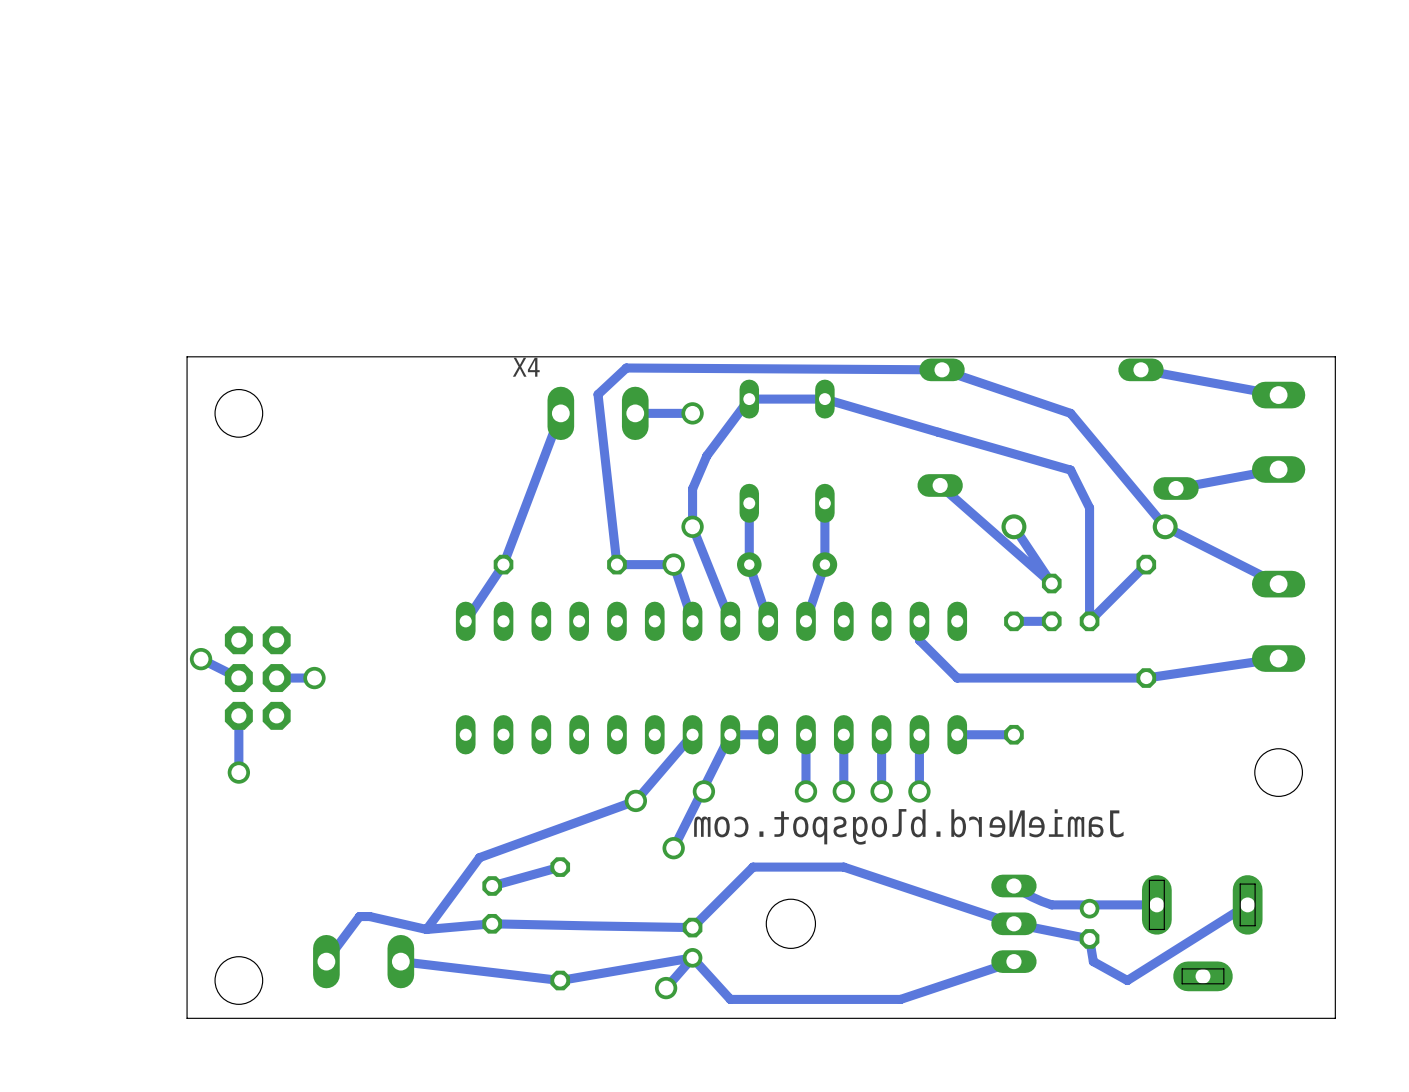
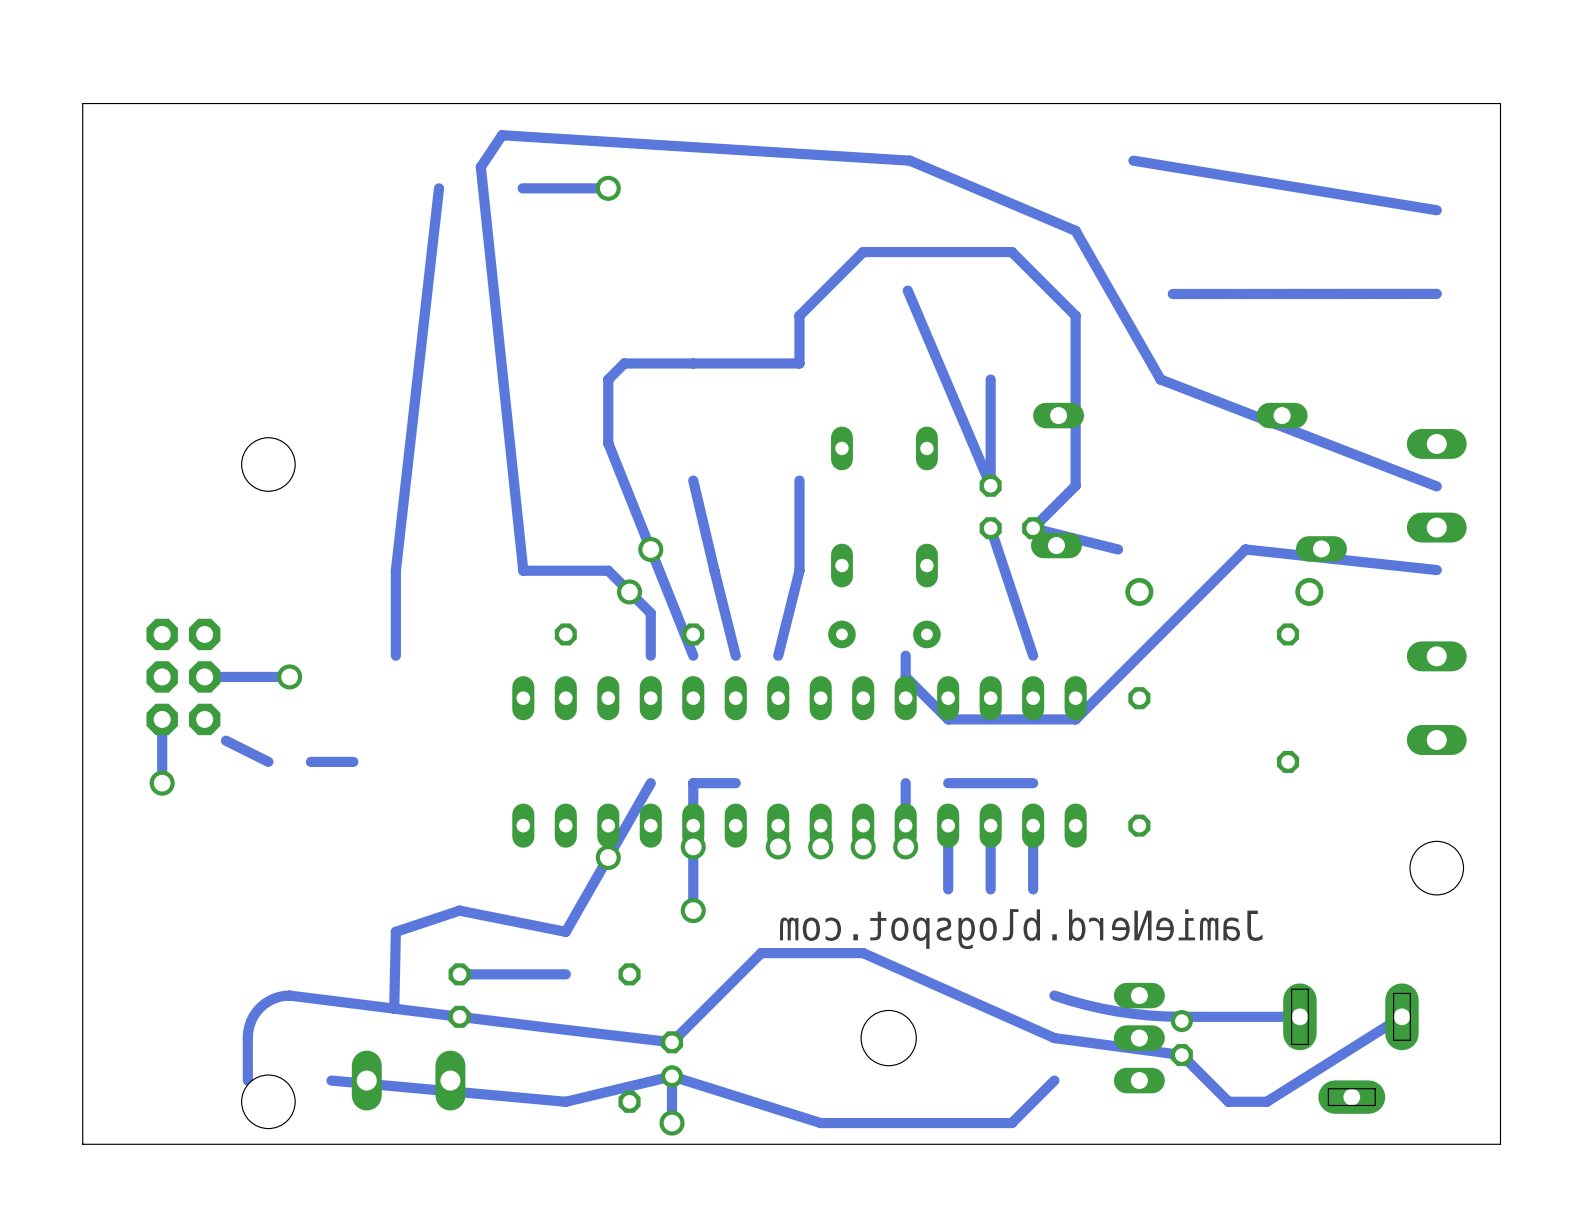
bottom track: none -> (1133, 160) (1436, 210)
bottom track: none -> (439, 188) (395, 570) (395, 655)
bottom track: none -> (608, 188) (522, 188)
via: none -> (608, 188)
bottom track: none -> (907, 290) (990, 485) (990, 379)
bottom track: none -> (1436, 293) (1172, 294)
board edge: (1335, 356) (187, 356) (187, 1018) -> (1500, 400) (1500, 103) (82, 103) (82, 1144) (210, 1144)
bottom track: (1140, 369) (1278, 395) -> none
bottom track: (560, 413) (503, 564) (465, 621) -> none
X4: (598, 413) -> none
bottom track: (692, 413) (635, 413) -> none
via: (692, 413) -> none
bottom track: none -> (693, 480) (735, 655)
bottom track: none -> (799, 480) (799, 570) (778, 655)
bottom track: none -> (1436, 486) (1160, 379) (1075, 230) (909, 160) (502, 135) (480, 167) (523, 570) (608, 570) (650, 613) (650, 655)
bottom track: (1278, 469) (1176, 488) -> none
bottom track: none -> (990, 528) (1033, 655)
bottom track: (940, 485) (1051, 583) (1013, 526) -> none
via: none -> (650, 549)
bottom track: none -> (1118, 549) (1033, 528) (1075, 485) (1075, 315) (1011, 252) (863, 252) (799, 315) (799, 363) (624, 363) (608, 379) (608, 443) (693, 655)
bottom track: (749, 503) (749, 564) (768, 621) -> none
bottom track: (824, 503) (824, 564) (805, 621) -> none
bottom track: none -> (1436, 570) (1245, 549) (1075, 719) (948, 719) (905, 676) (905, 655)
via: none -> (629, 591)
via: (692, 526) -> none
via: (673, 564) -> none
bottom track: (1146, 564) (1089, 621) (1089, 507) (1070, 470) (824, 399) (749, 399) (706, 455) (692, 489) (692, 526) (730, 621) -> none
bottom track: (1278, 584) (1165, 526) (1070, 413) (942, 369) (626, 368) (598, 394) (616, 564) (673, 564) (692, 621) -> none
bottom track: none -> (289, 676) (204, 676)
via: none -> (289, 676)
part position: (1070, 602) -> (1011, 506)
bottom track: (919, 621) (919, 640) (957, 678) (1146, 678) (1278, 658) -> none
bottom track: (1051, 621) (1013, 621) -> none
via: (201, 659) -> none
part position: (257, 678) -> (183, 676)
via: (314, 678) -> none
via: none -> (162, 783)
bottom track: none -> (650, 783) (565, 931) (459, 910) (395, 931) (394, 1008)
bottom track: none -> (735, 783) (693, 783) (693, 910)
bottom track: none -> (1033, 783) (948, 783)
bottom track: (238, 715) (238, 772) -> (162, 719) (162, 783)
bottom track: (692, 734) (635, 800) (479, 857) (426, 929) -> none
bottom track: (768, 734) (730, 734) (673, 848) -> none
bottom track: (1013, 734) (957, 734) -> none
via: none -> (693, 846)
via: none -> (778, 846)
via: none -> (820, 846)
via: none -> (863, 846)
bottom track: (805, 753) (805, 791) -> (905, 783) (905, 825)
via: none -> (905, 846)
via: none -> (608, 857)
via: (238, 772) -> none
via: (703, 791) -> none
via: (805, 791) -> none
via: (843, 791) -> none
via: (881, 791) -> none
via: (919, 791) -> none
via position: (635, 800) -> (693, 910)
via: (673, 848) -> none
bottom track: none -> (565, 974) (459, 974)
bottom track: (560, 867) (492, 886) -> none
bottom track: (1013, 886) (1032, 897) (1051, 904) -> (1054, 995) (1117, 1011) (1181, 1016)
part position: (492, 904) -> (459, 995)
part position: (1089, 923) -> (1181, 1038)
bottom track: (426, 929) (492, 923) (692, 927) (753, 867) (843, 867) (1013, 923) (1089, 938) (1093, 961) (1127, 980) -> (247, 1080) (247, 1037) (251, 1021) (264, 1004) (278, 997) (289, 995) (672, 1042) (761, 953) (863, 953) (1054, 1038) (1181, 1055) (1228, 1101) (1266, 1101)
bottom track: (426, 929) (369, 916) (359, 916) (325, 961) -> none
part position: (692, 942) -> (672, 1059)
bottom track: none -> (672, 1076) (565, 1101) (331, 1080)
bottom track: none -> (672, 1076) (672, 1123)
bottom track: (692, 957) (730, 999) -> (672, 1076) (820, 1123)
bottom track: (692, 957) (560, 980) (400, 961) -> none
bottom track: (692, 957) (666, 988) -> none
bottom track: (1013, 961) (900, 999) -> (1054, 1080) (1011, 1123)
via position: (666, 988) -> (672, 1123)

